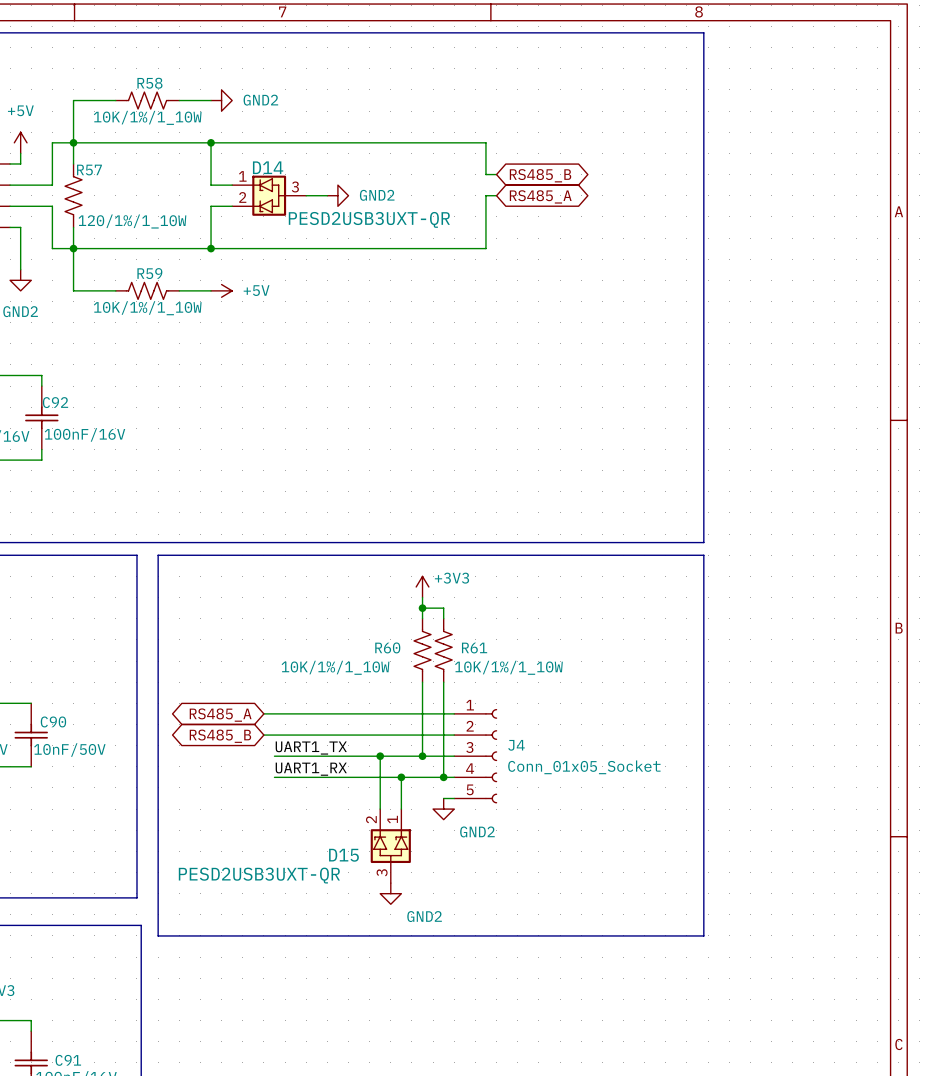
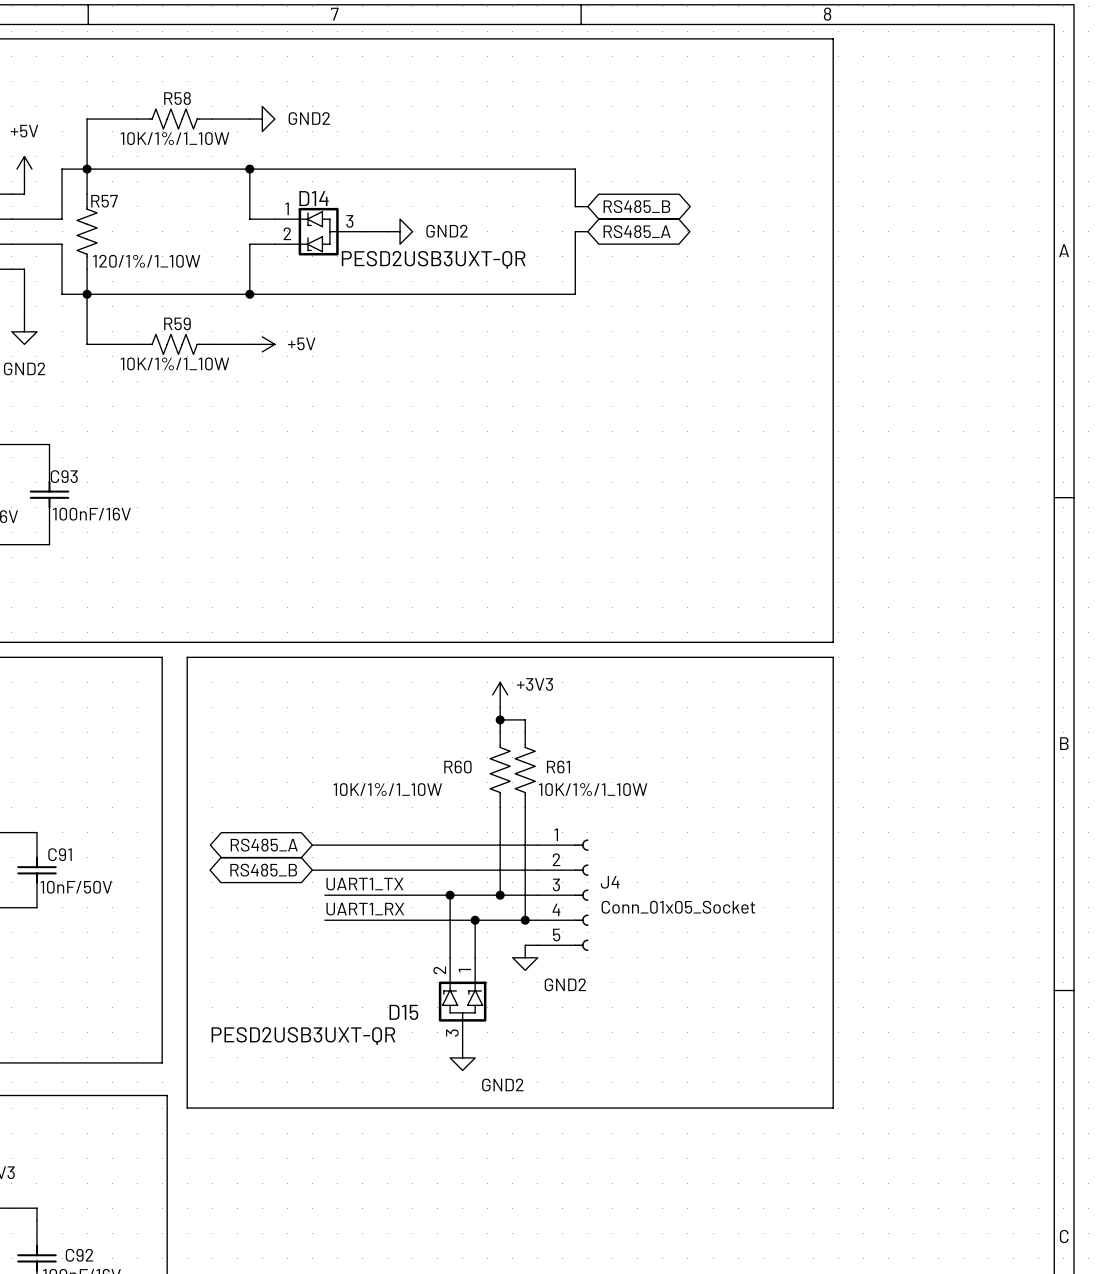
C92 name: C92 (55, 402) -> C93 (64, 476)
C90 name: C90 (53, 721) -> C91 (60, 854)
C91 name: C91 (68, 1060) -> C92 (79, 1255)

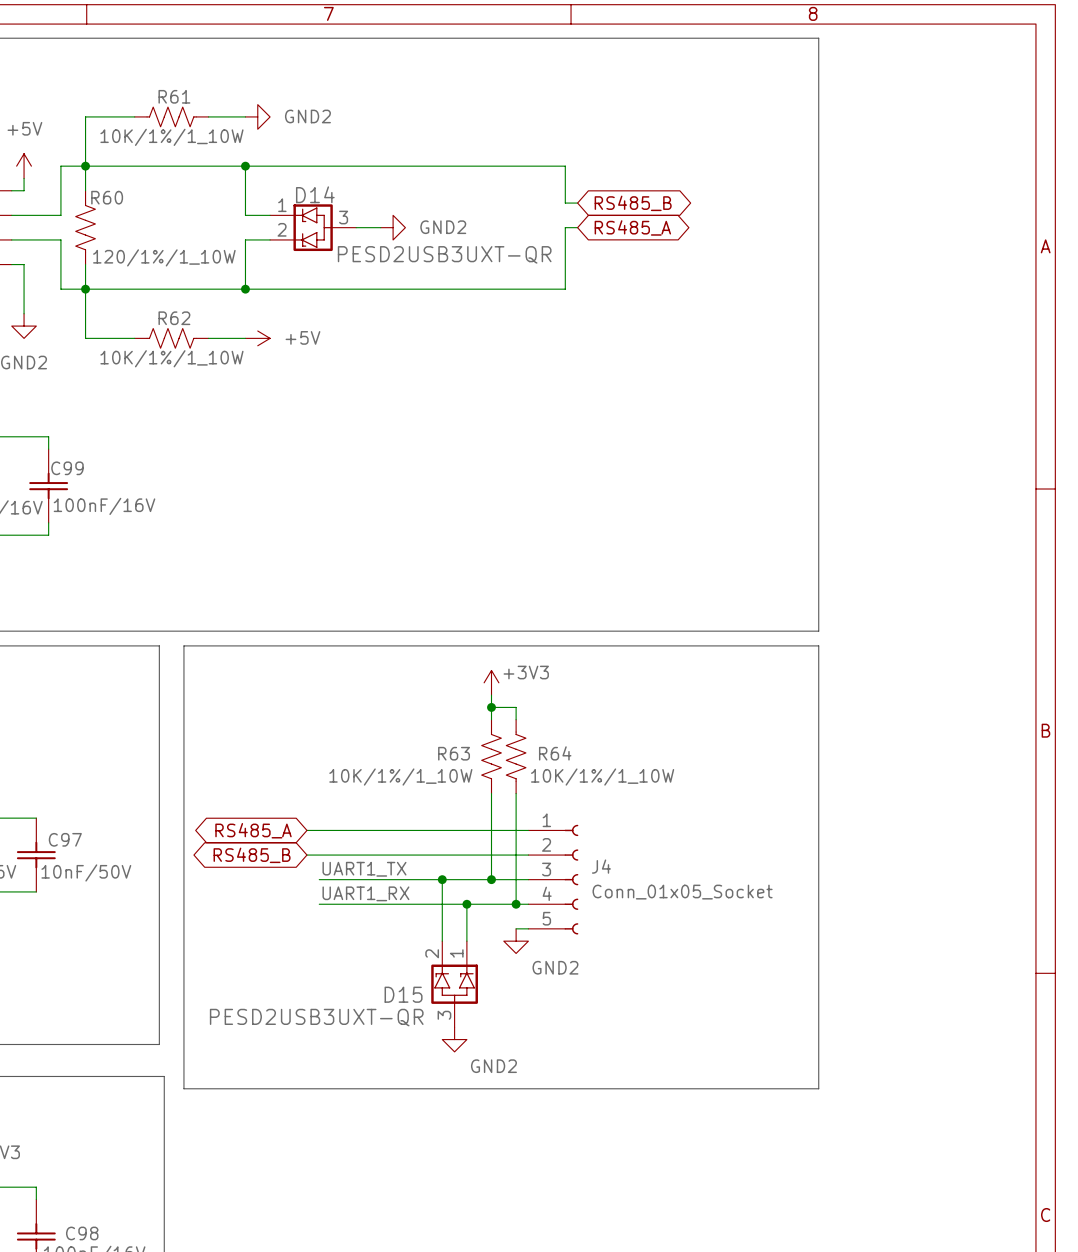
R58 name: R58 (177, 98) -> R61 (174, 96)
R57 name: R57 (104, 201) -> R60 (107, 197)
R59 name: R59 (177, 323) -> R62 (174, 318)
C93 name: C93 (64, 476) -> C99 (67, 468)
R60 name: R60 (457, 767) -> R63 (454, 753)
R61 name: R61 (558, 767) -> R64 (555, 753)
C91 name: C91 (60, 854) -> C97 (65, 839)
C92 name: C92 (79, 1255) -> C98 (82, 1233)

